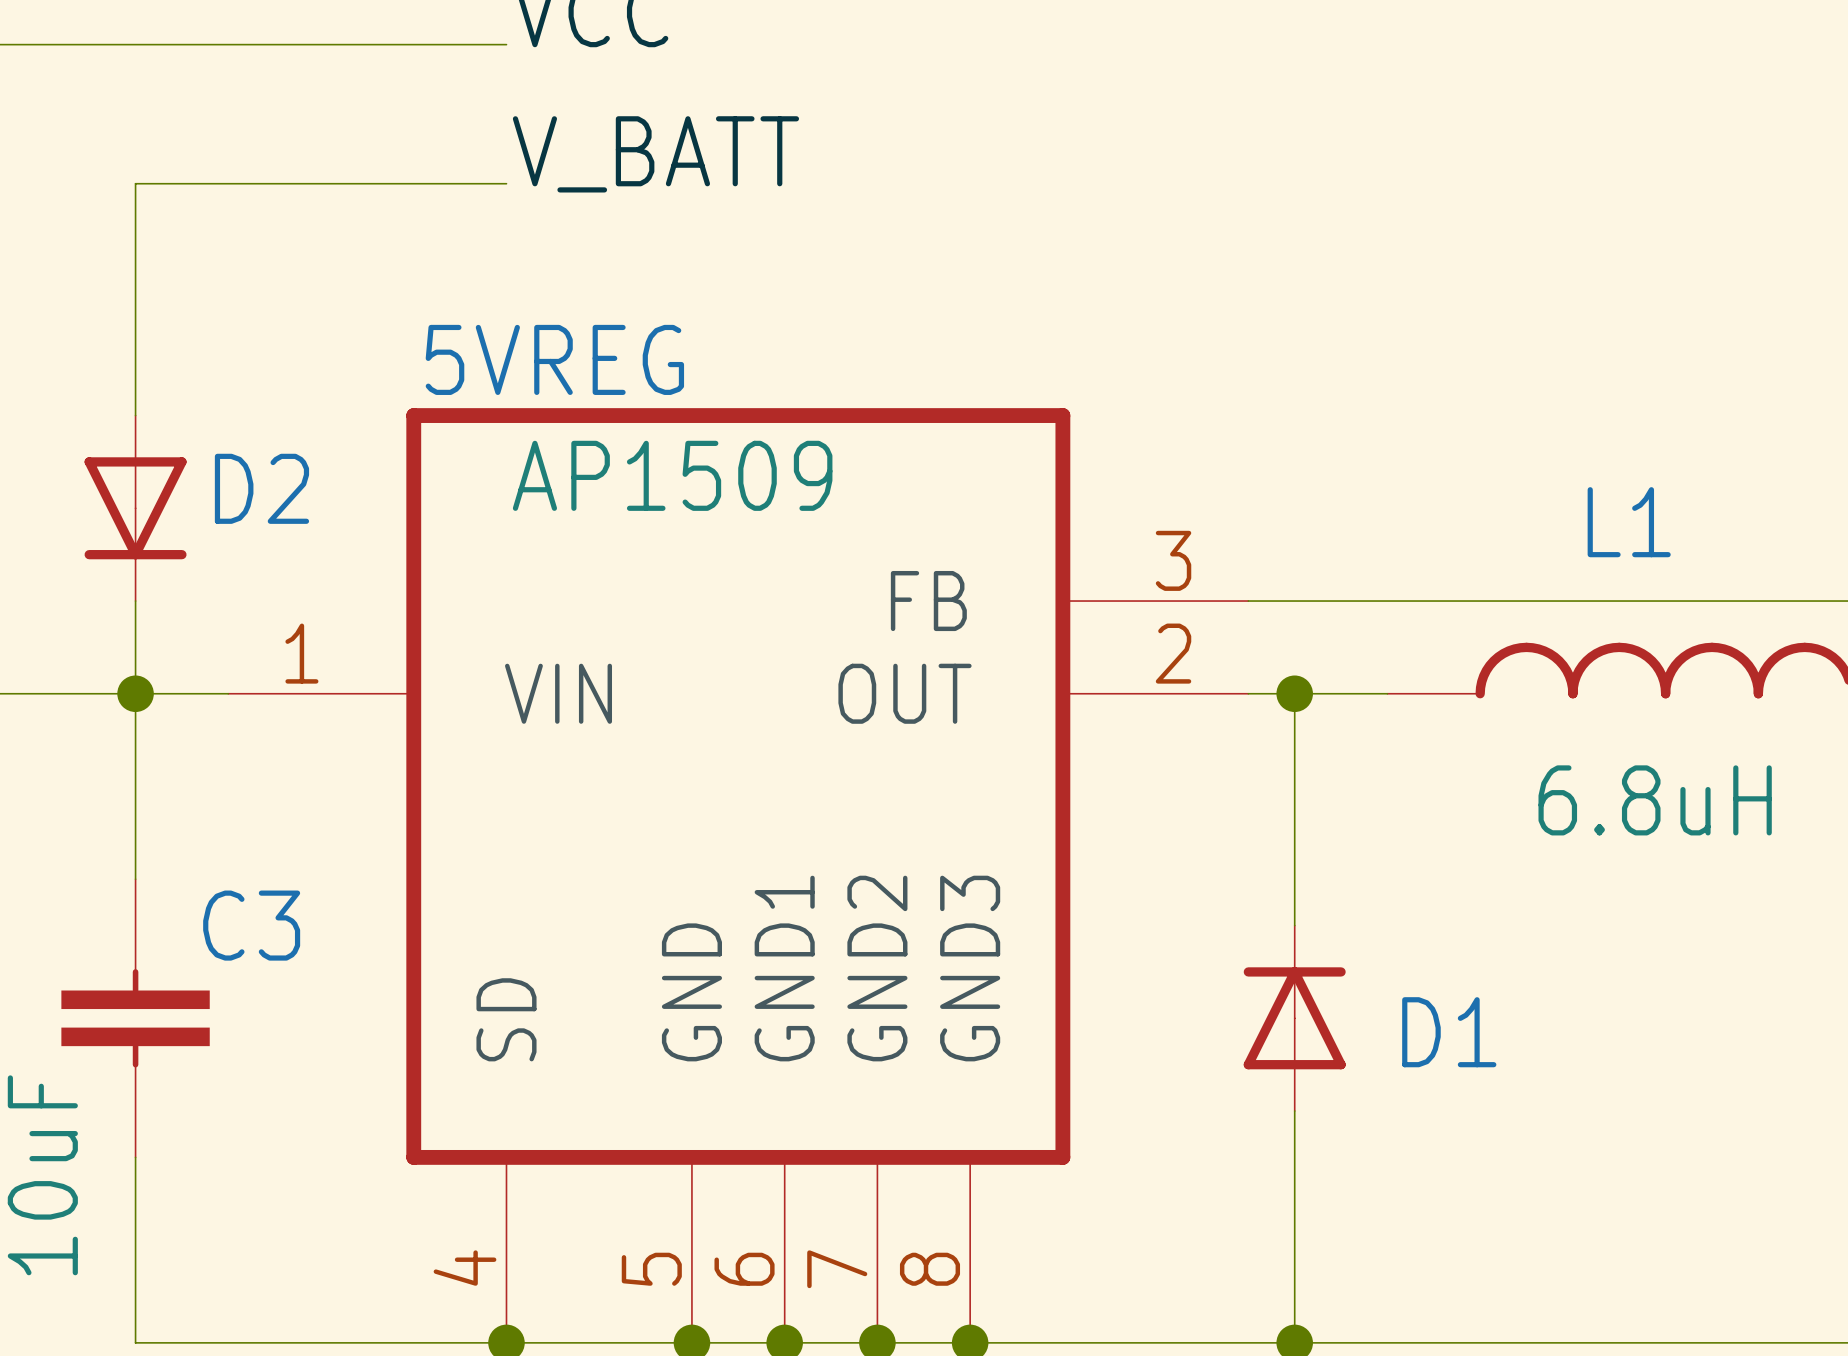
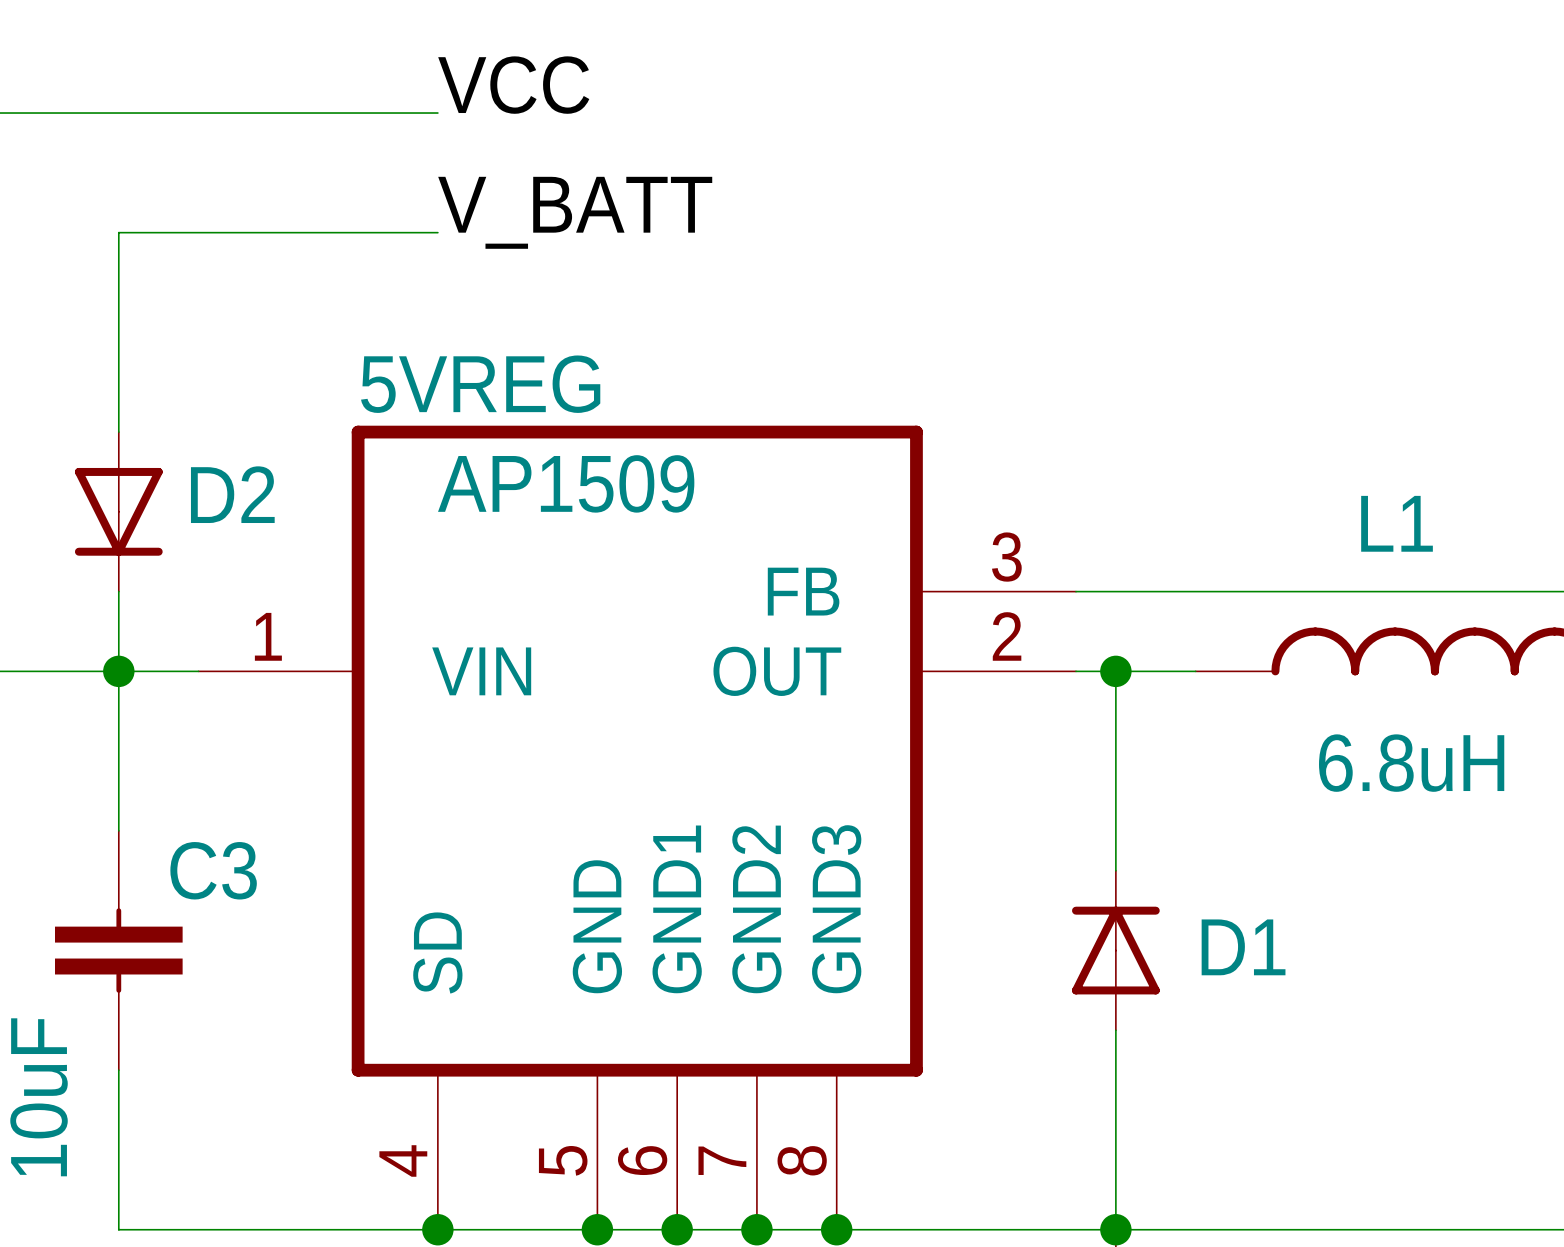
D1 name position: D1 (1449, 1032) -> D1 (1243, 947)

